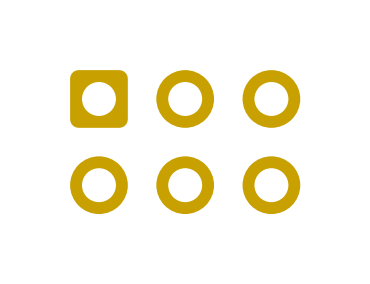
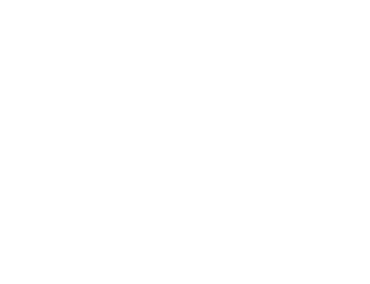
part: (185, 142) -> none

